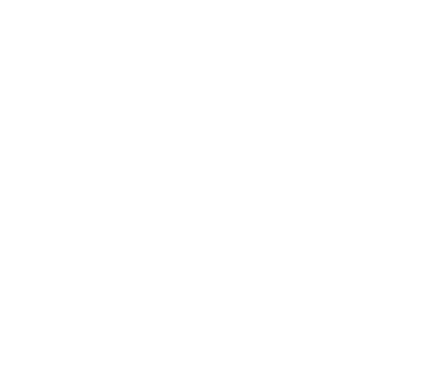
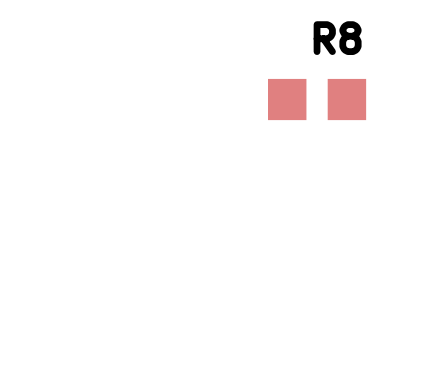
R8: none -> (317, 99)

